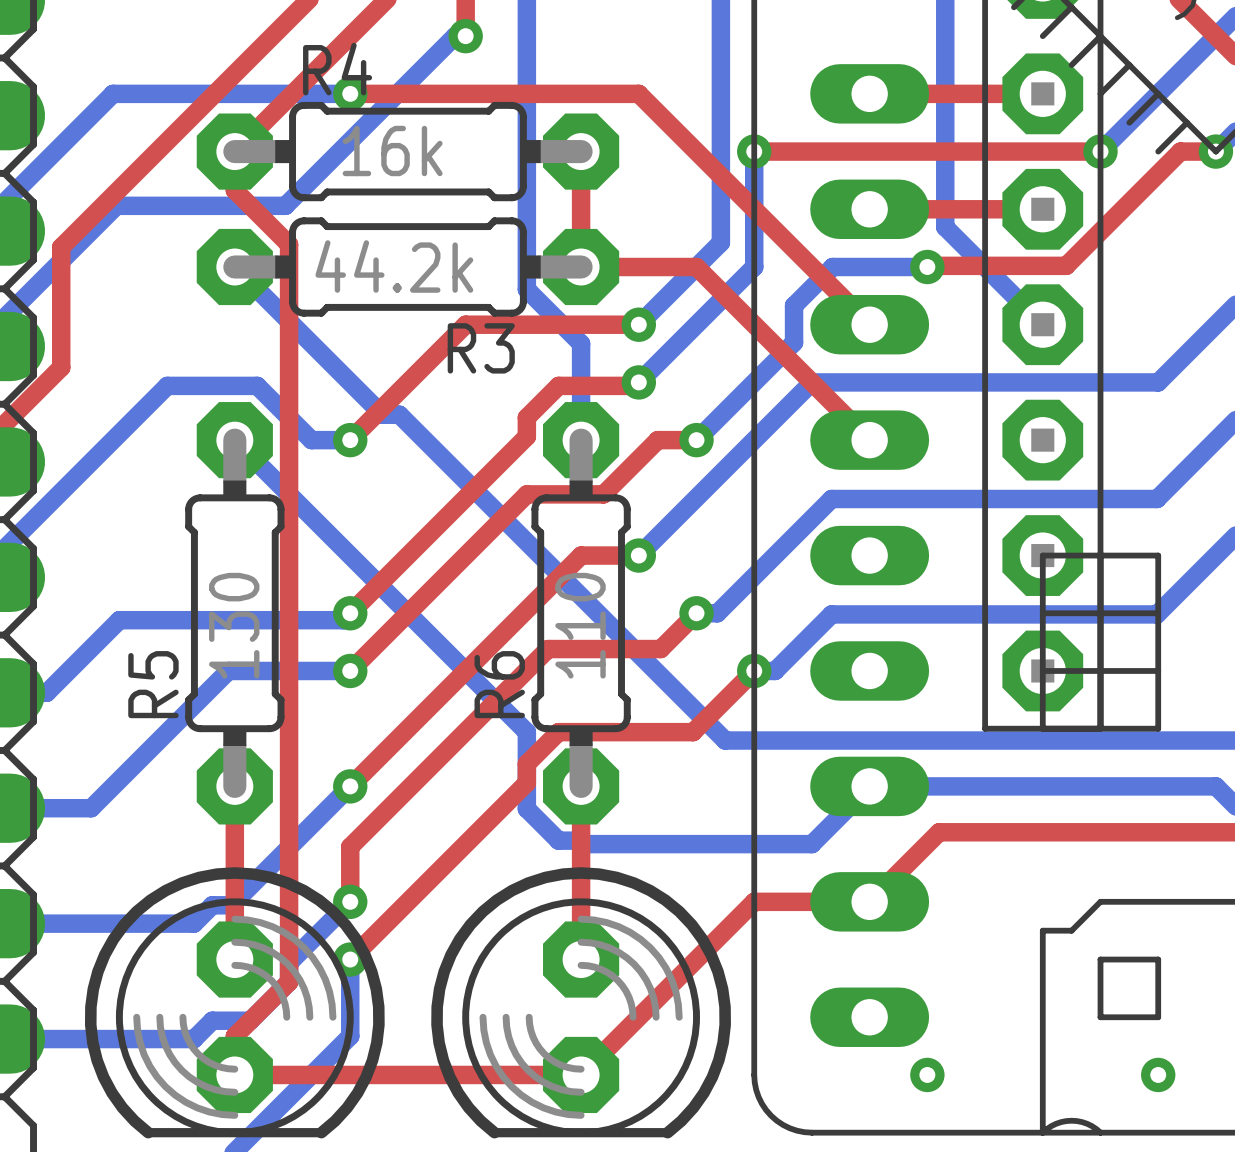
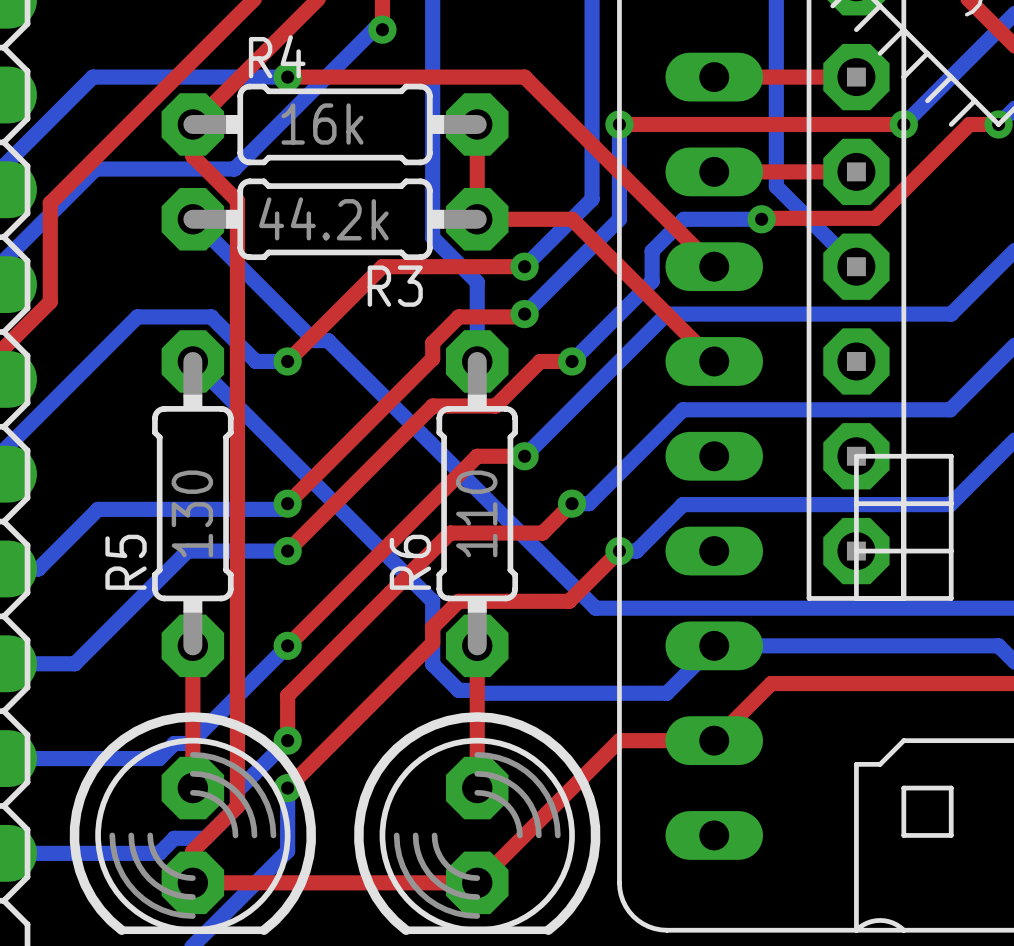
via: (927, 1074) -> none
via: (1158, 1074) -> none

